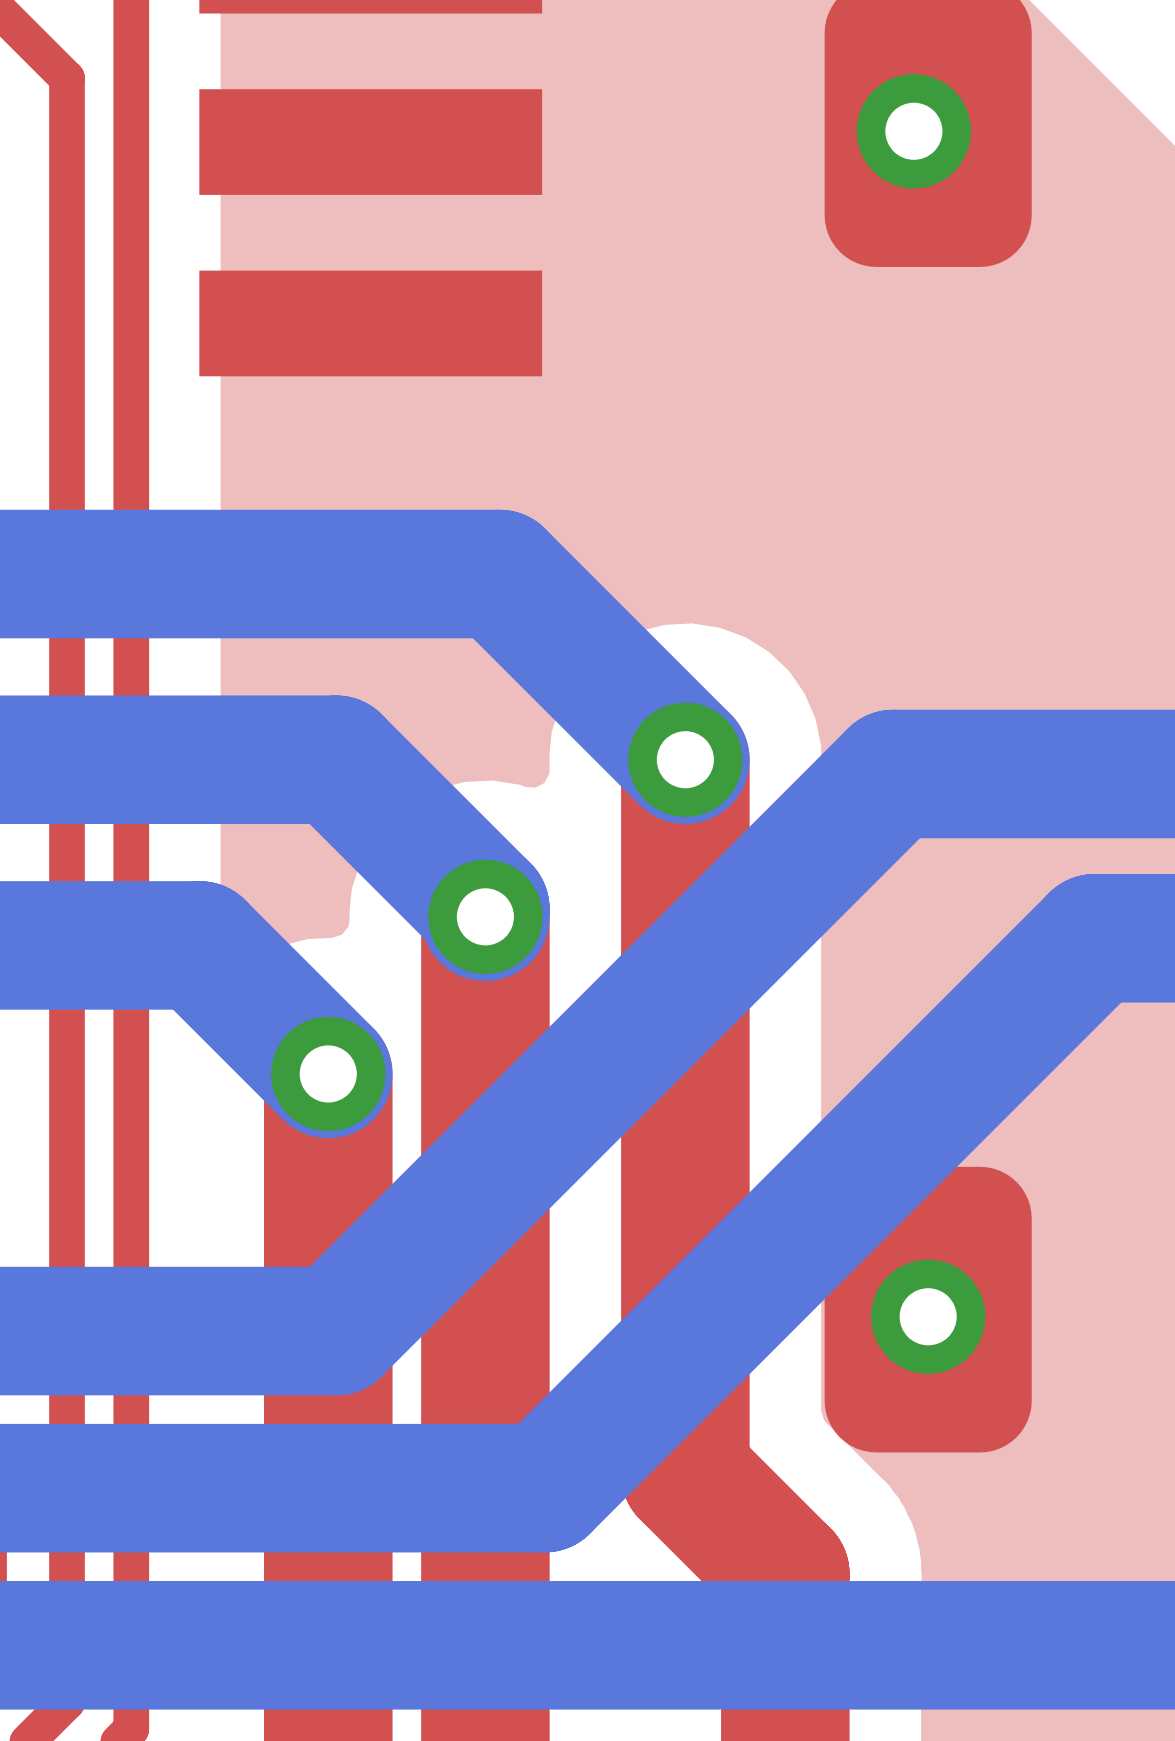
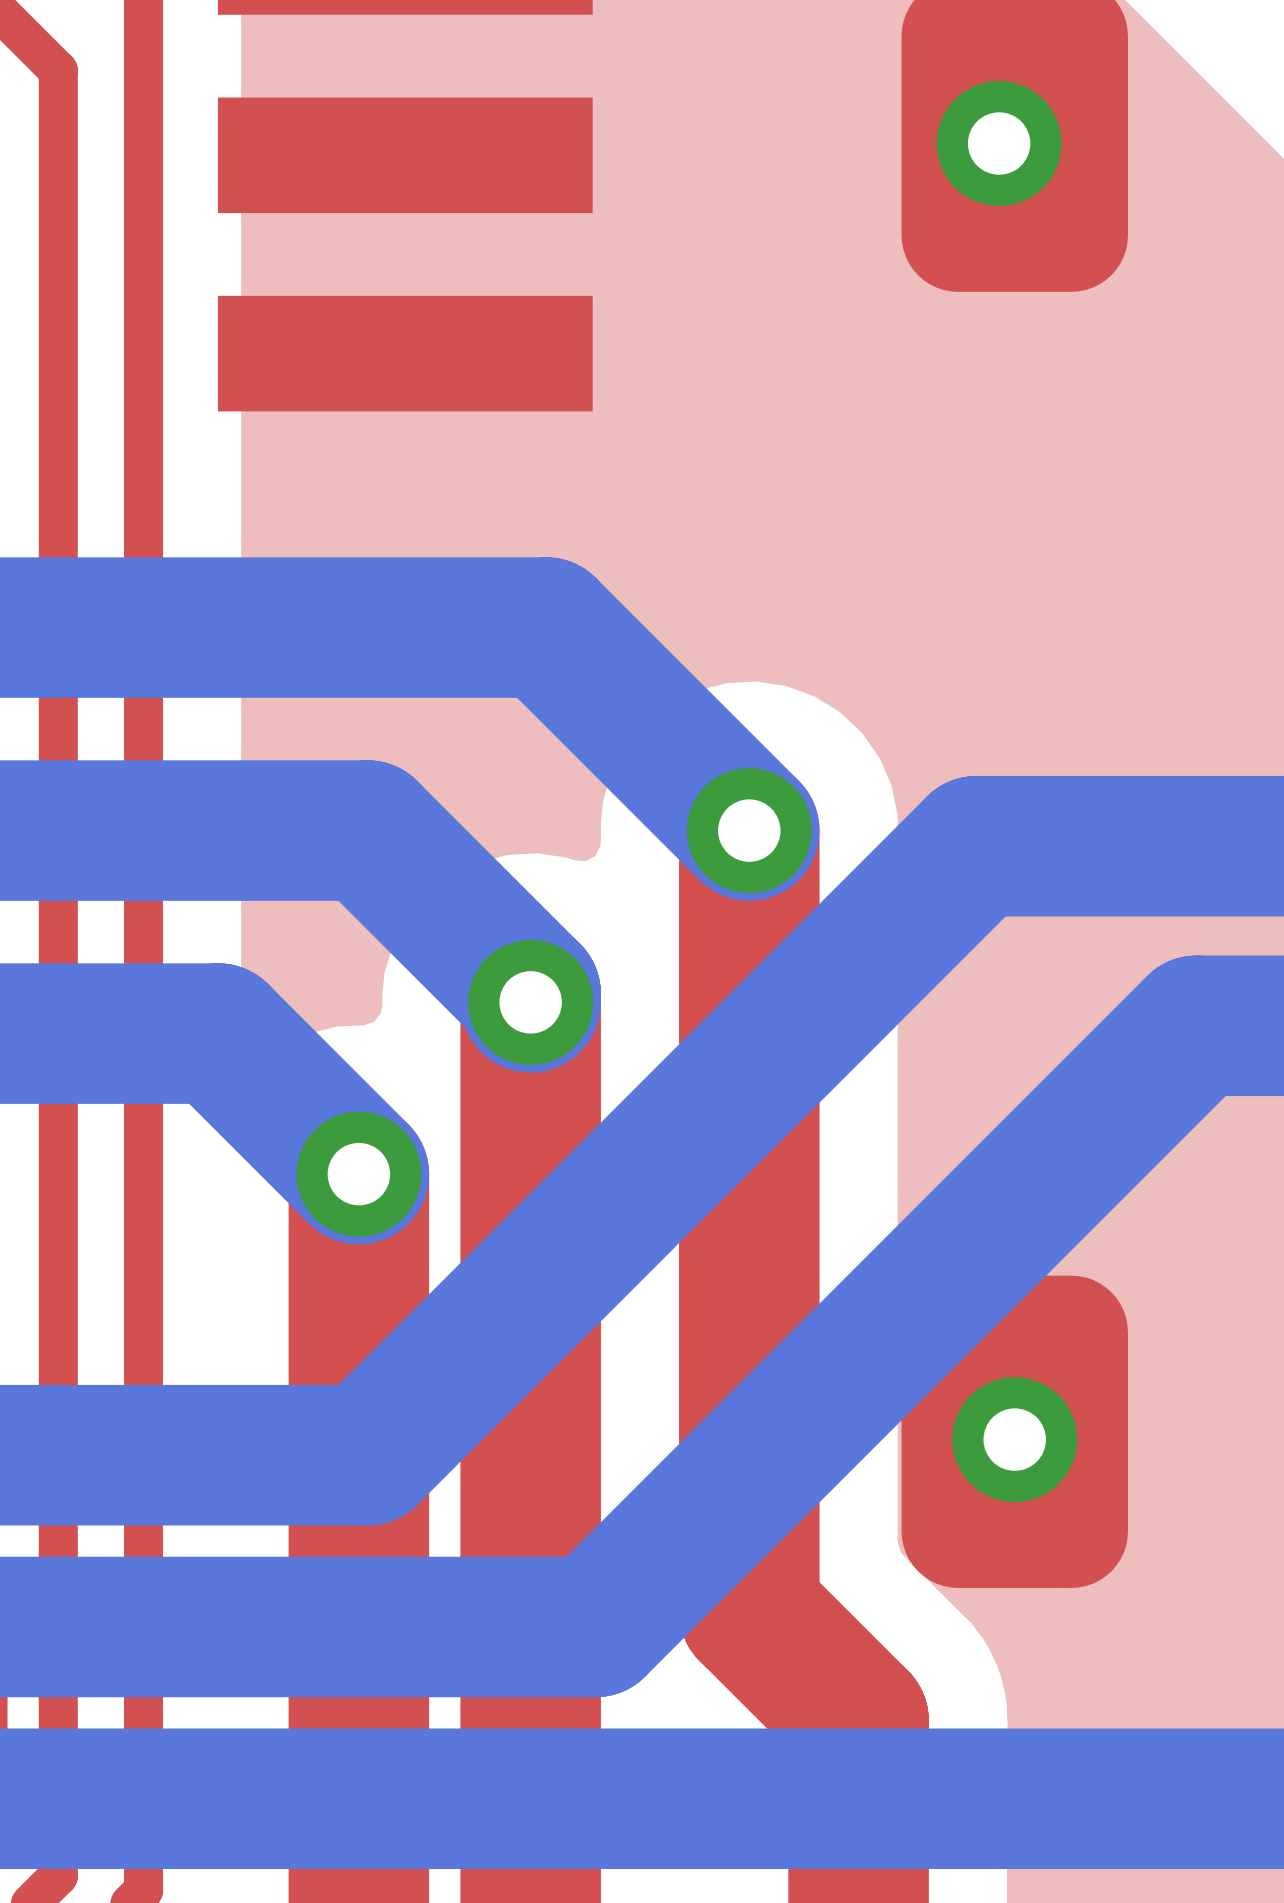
top track: (53, 64) (67, 78) (67, 1702) (53, 1715) -> (58, 70) (58, 1876)

